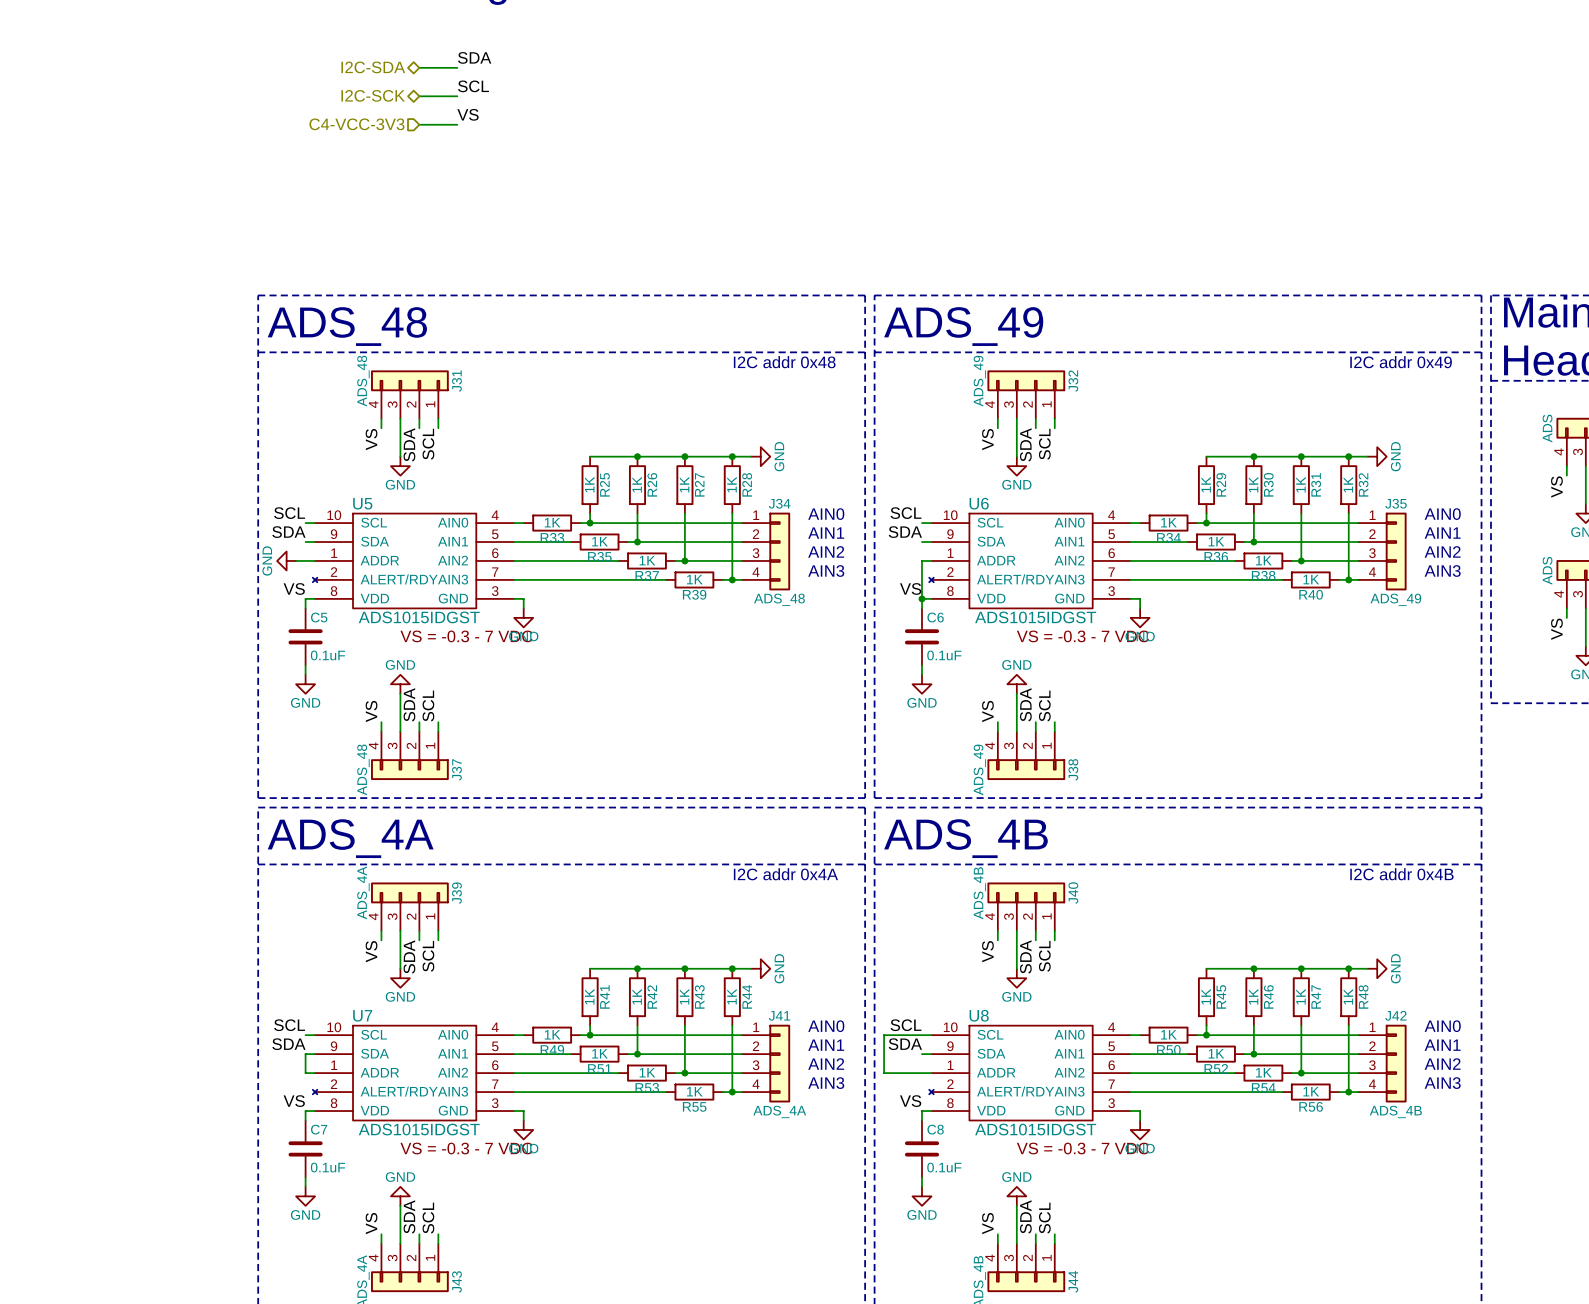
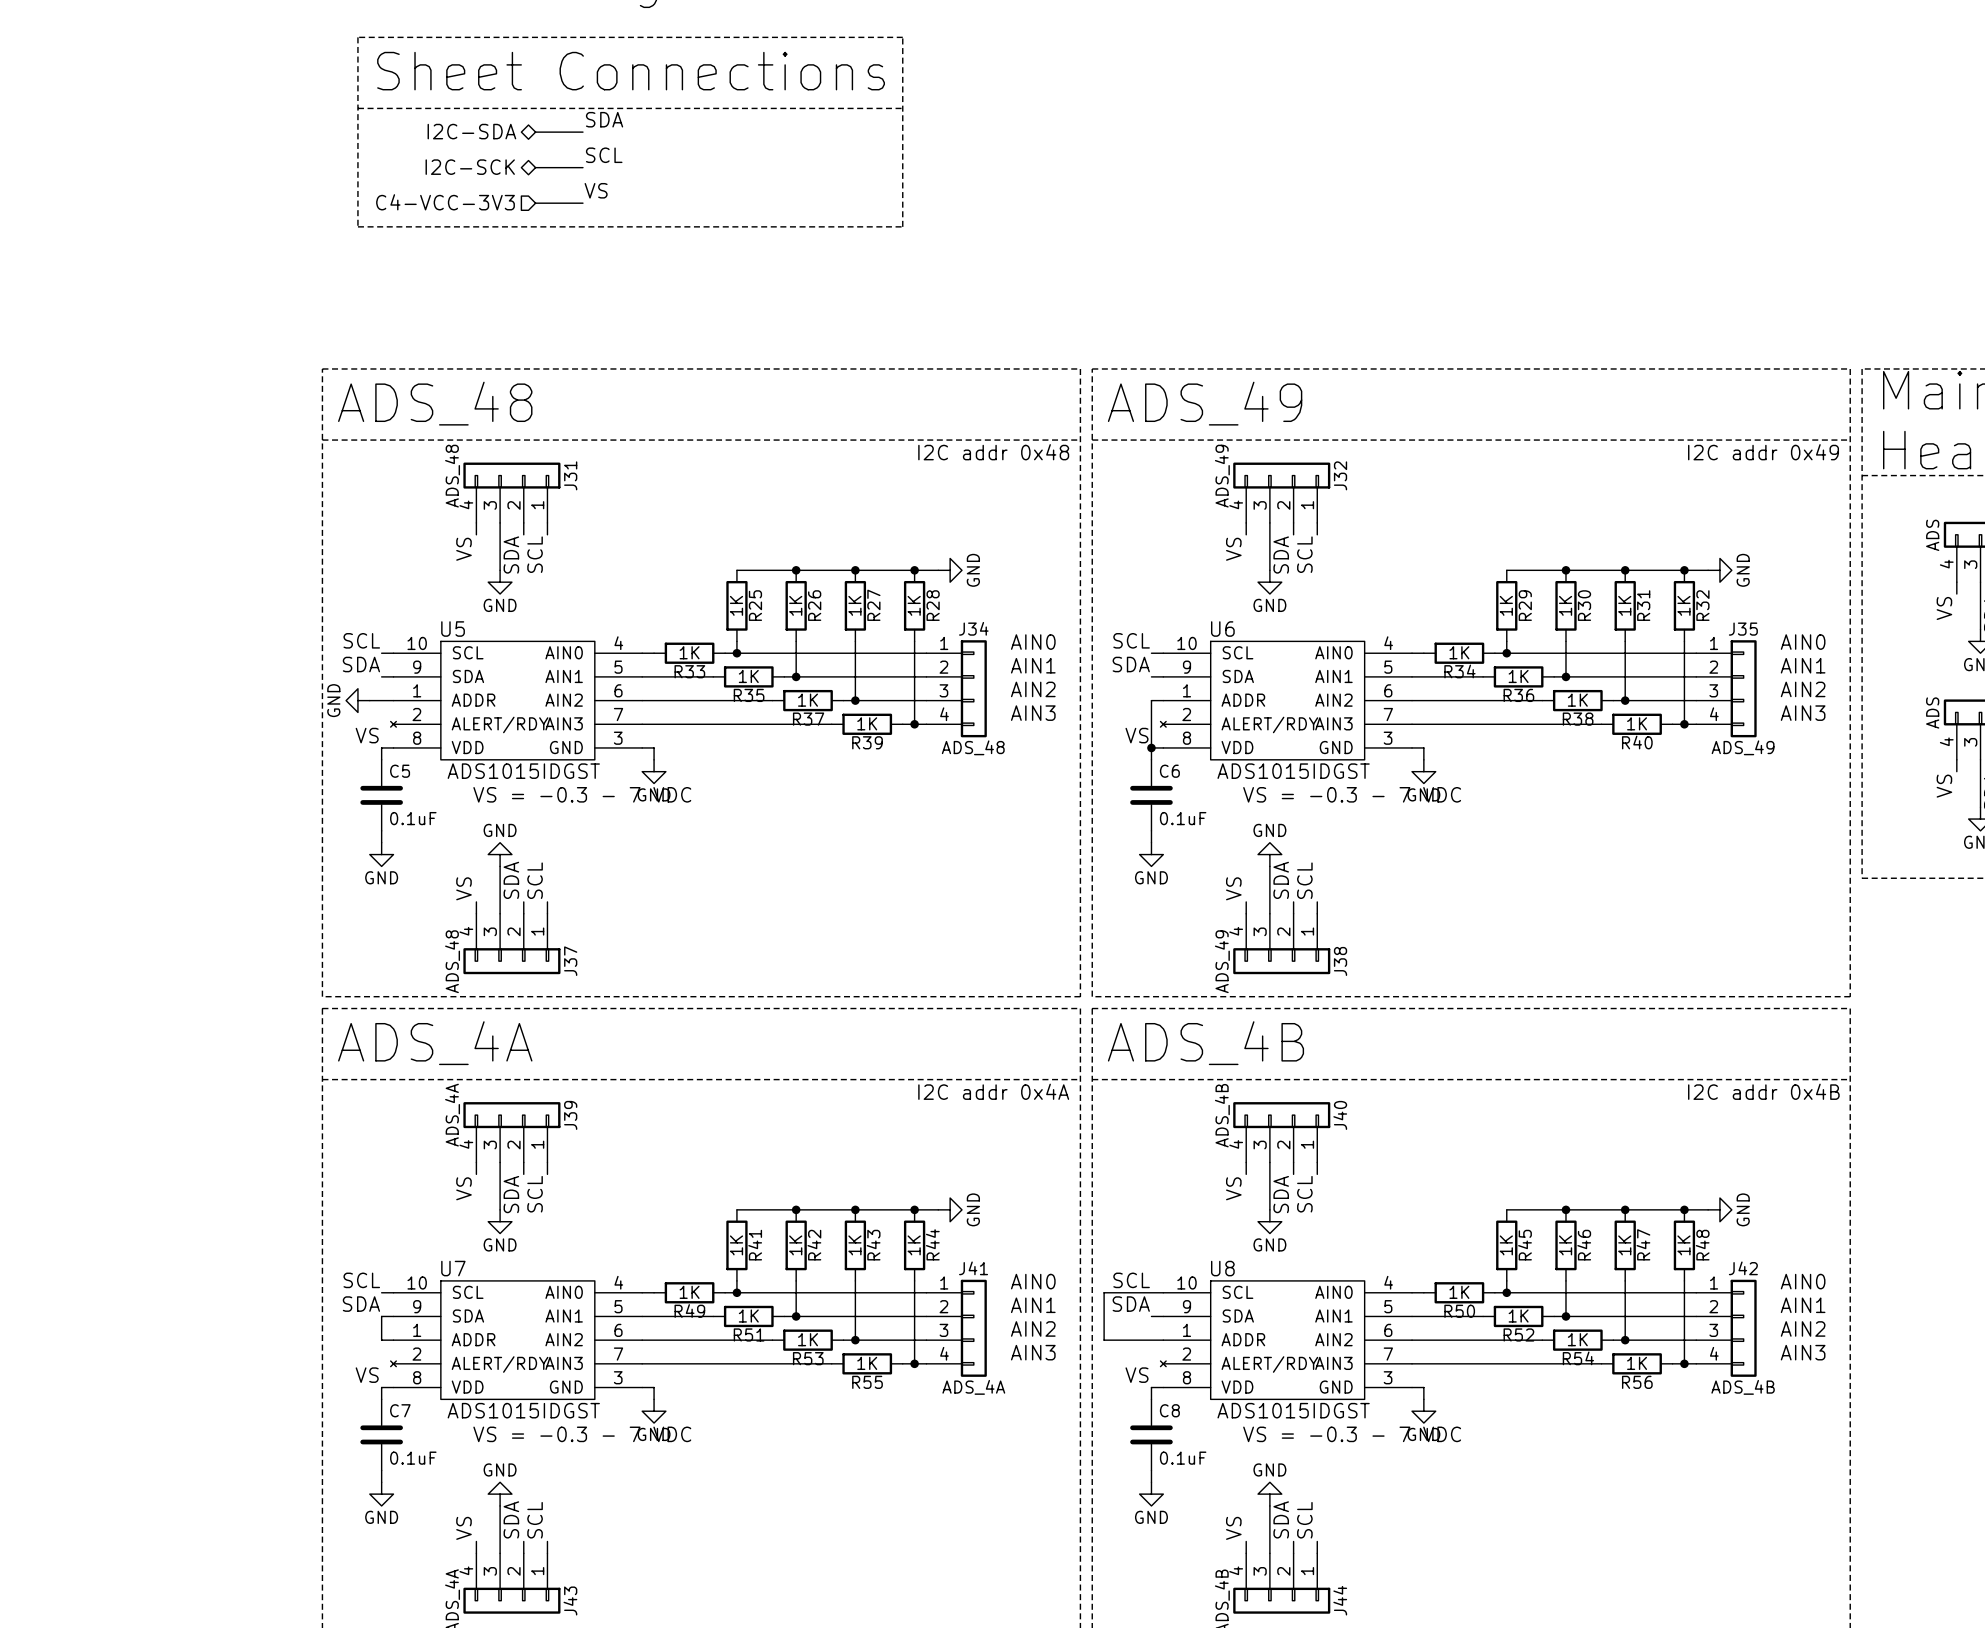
line: none -> (357, 37) (357, 226) (902, 226) (902, 37) (357, 37)
text: none -> Sheet Connections (631, 71)
label position: SDA (474, 57) -> SDA (604, 119)
hierarchical label position: I2C-SDA (373, 67) -> I2C-SDA (471, 131)
wire: (419, 67) (457, 67) -> (535, 132) (582, 132)
line: none -> (357, 108) (902, 108)
label position: SCL (473, 86) -> SCL (604, 155)
hierarchical label position: I2C-SCK (373, 95) -> I2C-SCK (470, 167)
wire: (419, 96) (457, 96) -> (535, 167) (582, 167)
label position: VS (468, 114) -> VS (596, 190)
hierarchical label position: C4-VCC-3V3 (356, 124) -> C4-VCC-3V3 (445, 202)
wire: (419, 124) (457, 124) -> (535, 203) (582, 203)

